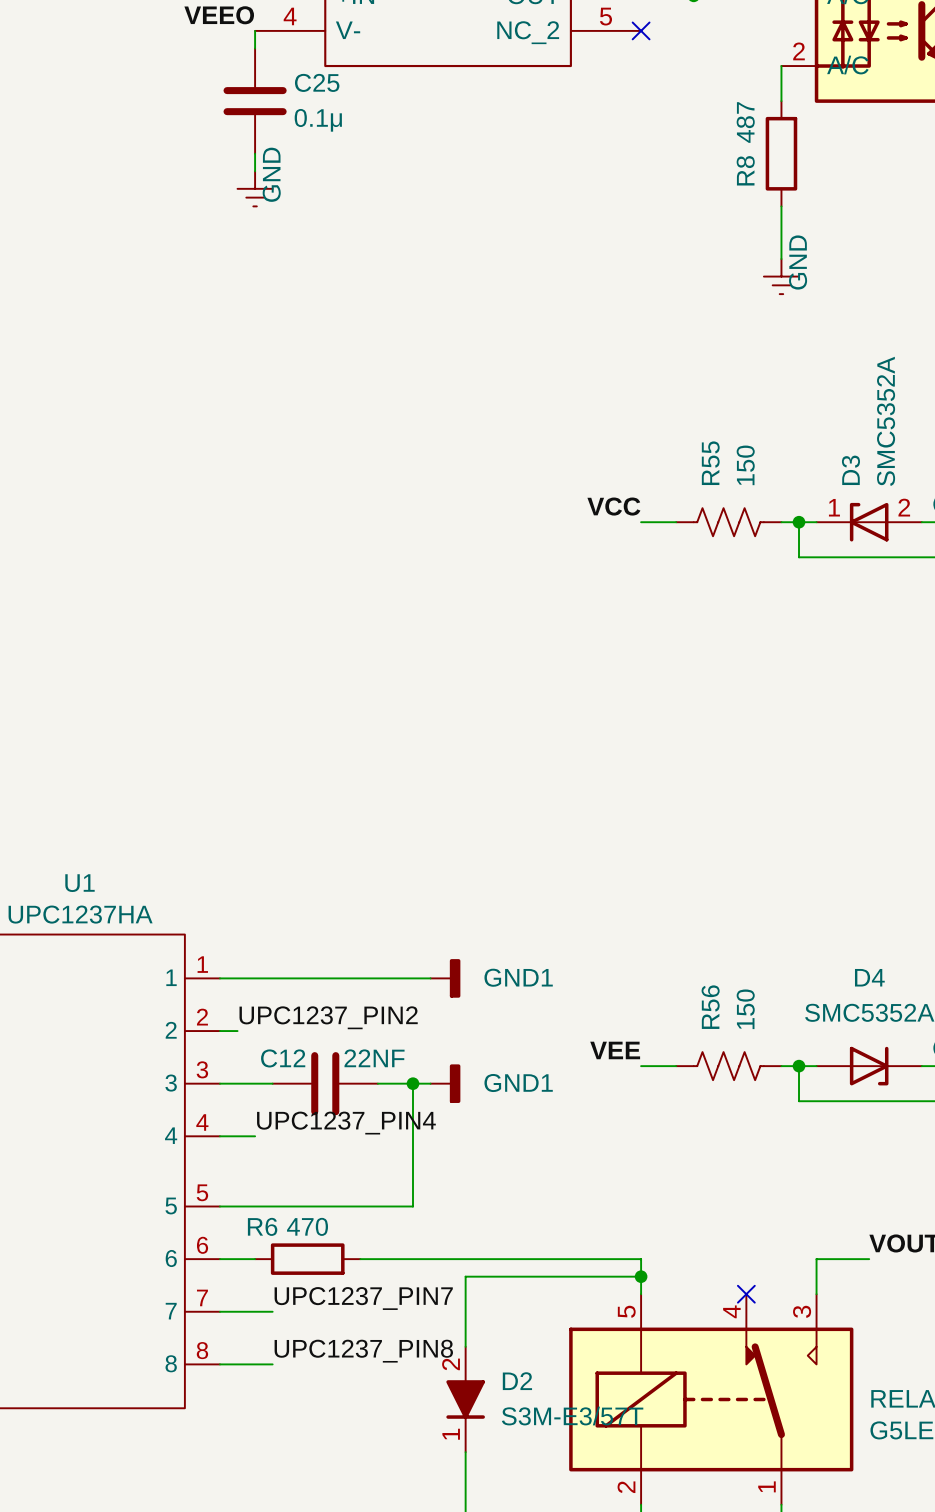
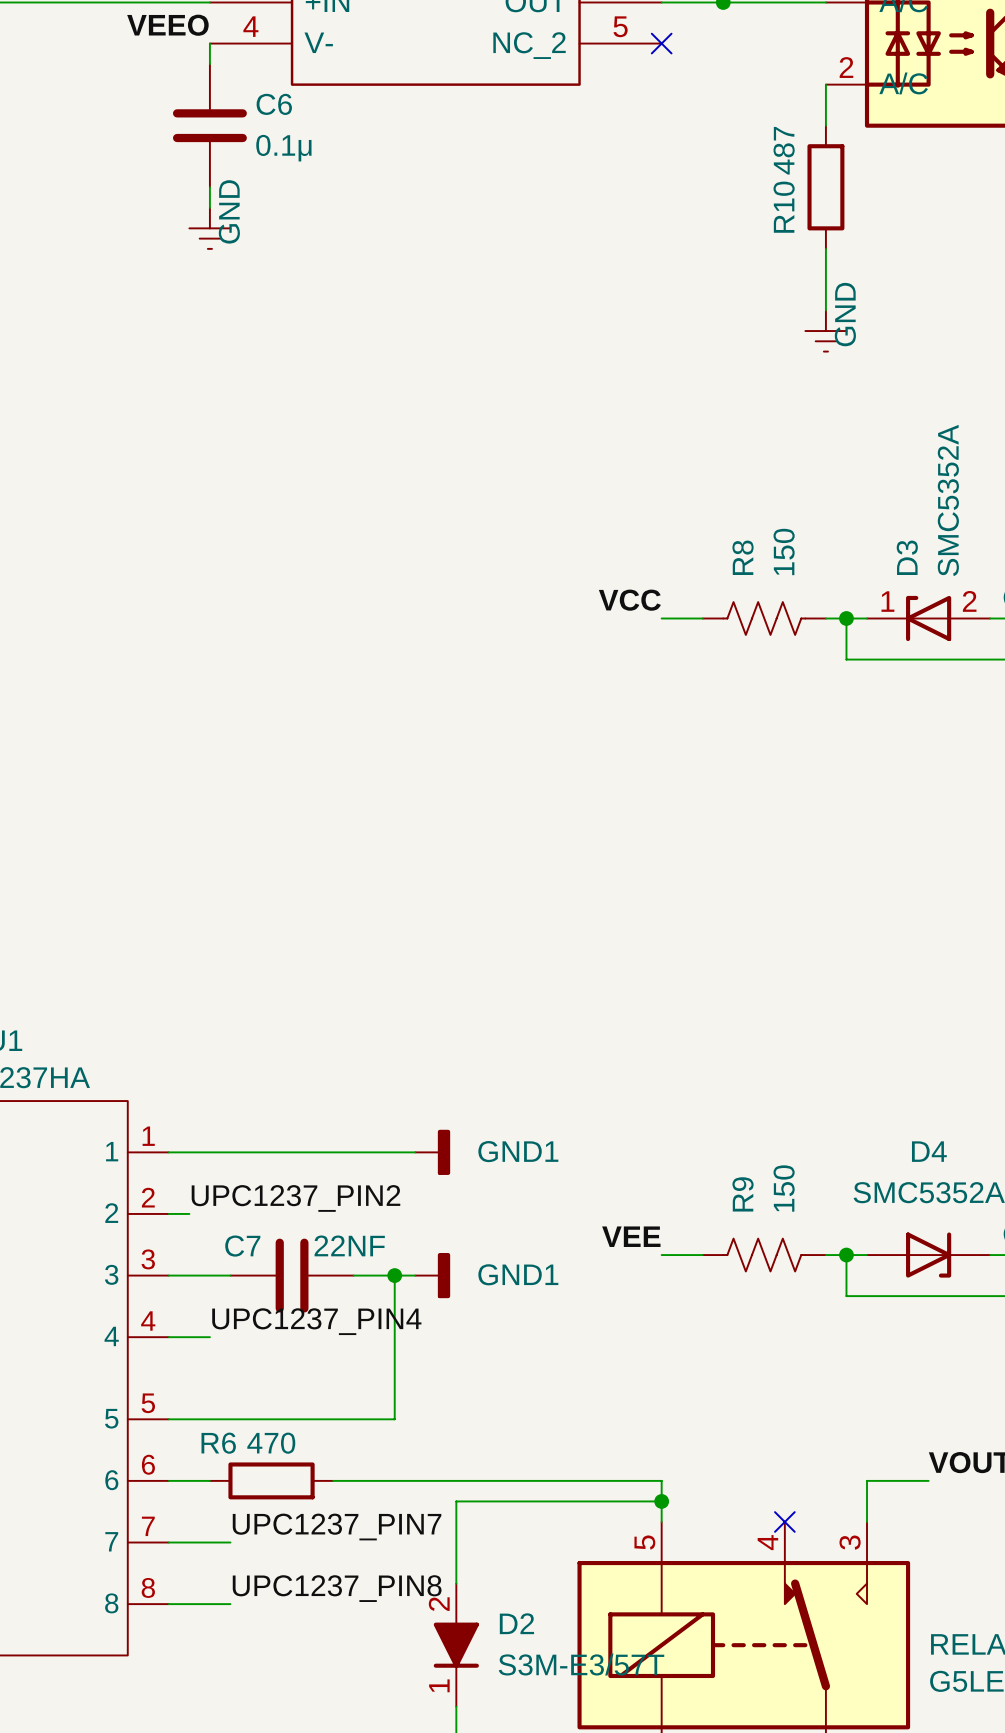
C25 name: C25 (317, 82) -> C6 (274, 104)
R8 name: R8 (745, 170) -> R10 (784, 207)
R55 name: R55 (710, 463) -> R8 (743, 557)
R56 name: R56 (710, 1007) -> R9 (743, 1194)
C12 name: C12 (283, 1058) -> C7 (242, 1246)

